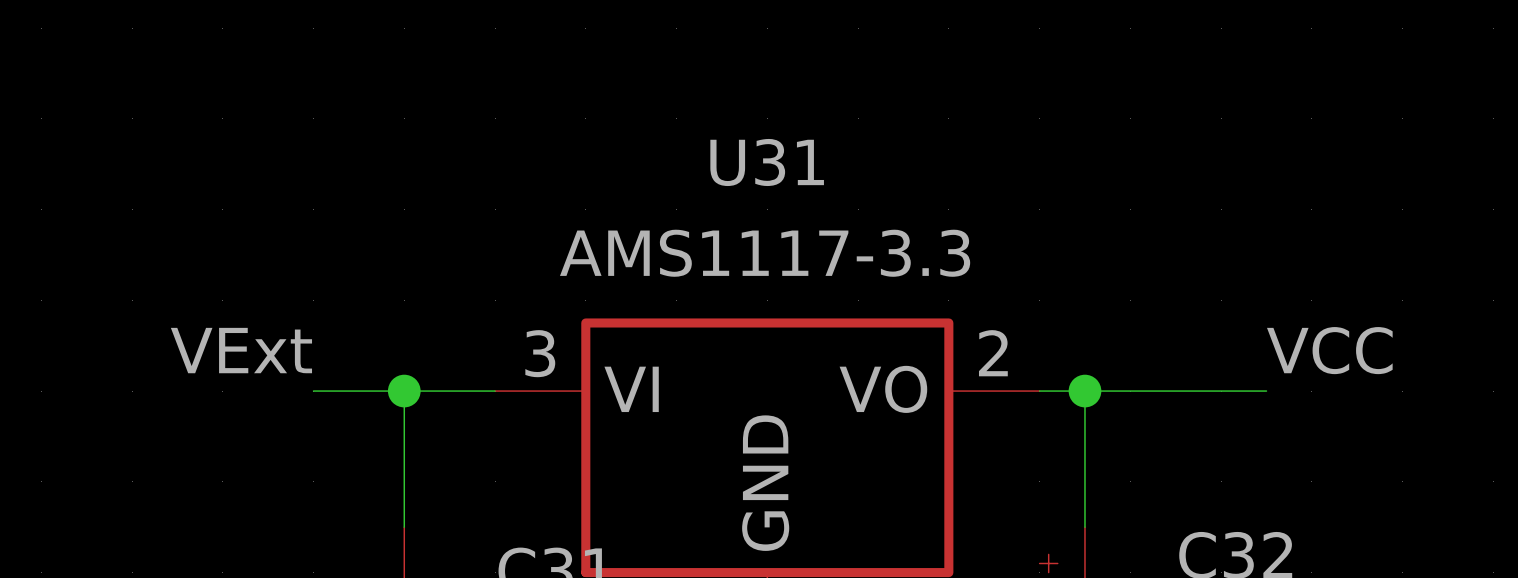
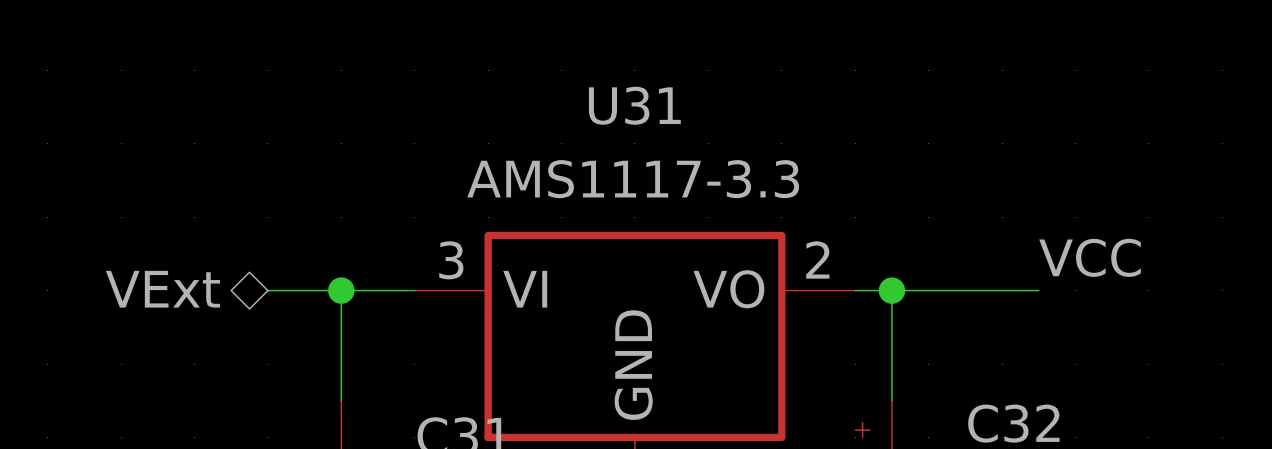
label: VExt (241, 350) -> none
hierarchical label: none -> VExt (162, 289)

